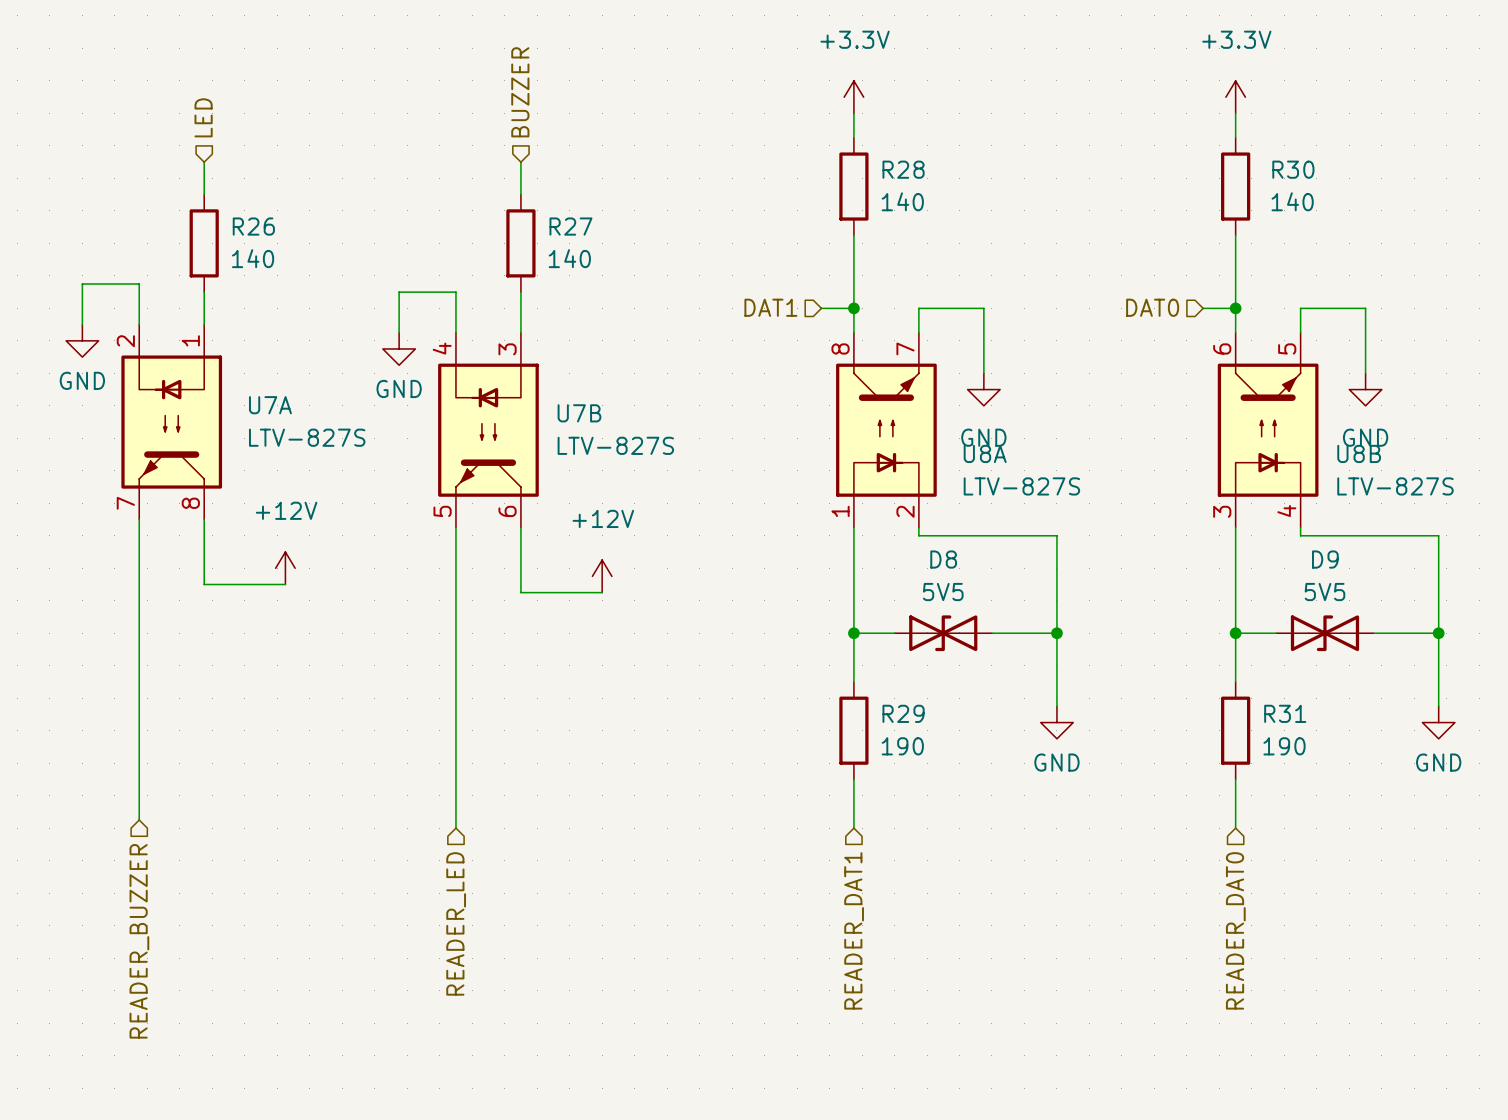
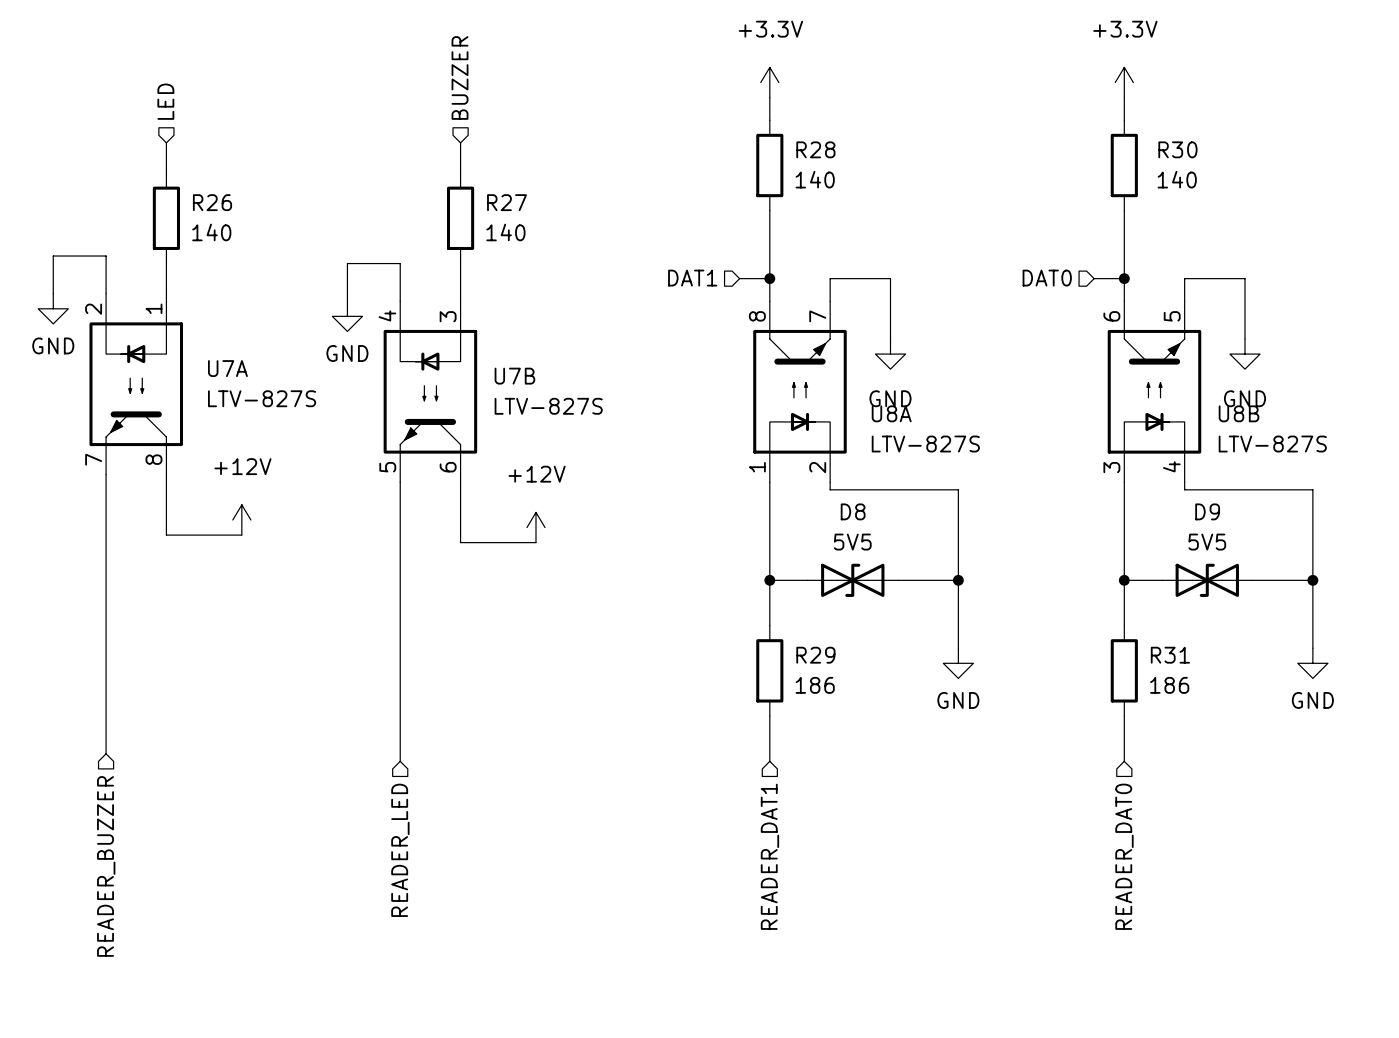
R29 value: 190 (902, 746) -> 186 (815, 685)
R31 value: 190 (1284, 746) -> 186 (1169, 685)

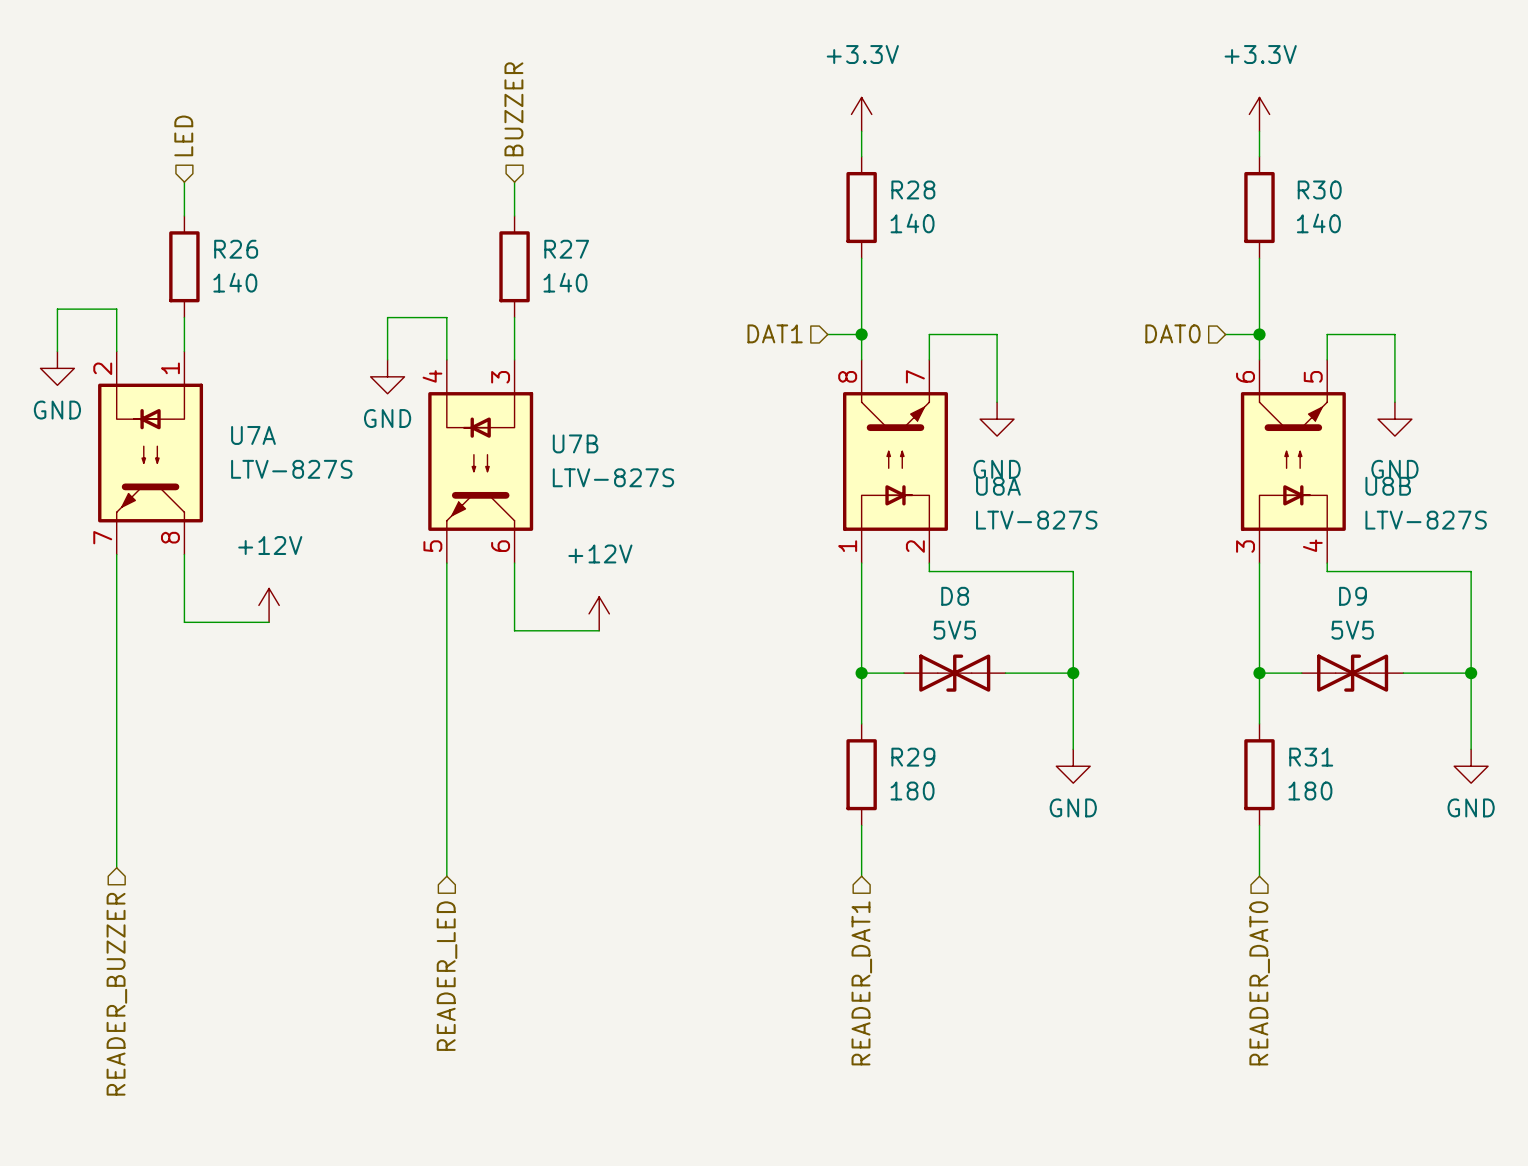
R29 value: 186 (815, 685) -> 180 (912, 791)
R31 value: 186 (1169, 685) -> 180 (1310, 791)

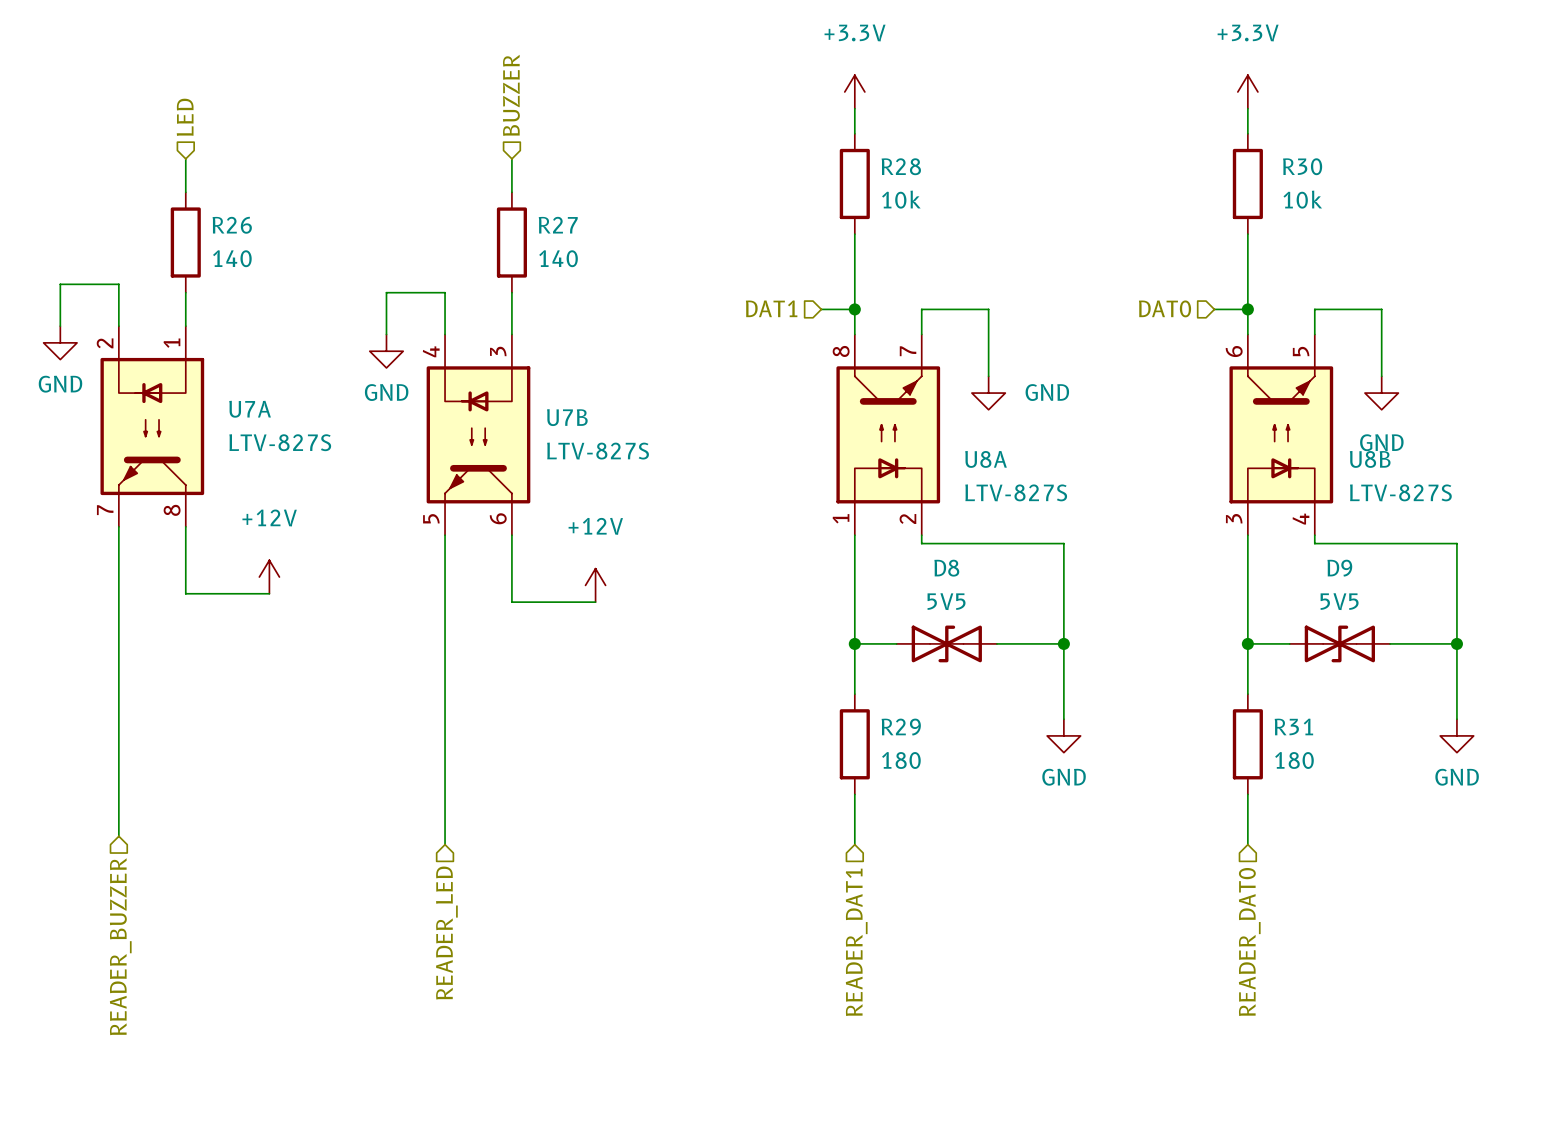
R28 value: 140 (912, 223) -> 10k (901, 199)
R30 value: 140 (1318, 223) -> 10k (1302, 199)
power symbol text position: GND (997, 469) -> GND (1047, 392)

